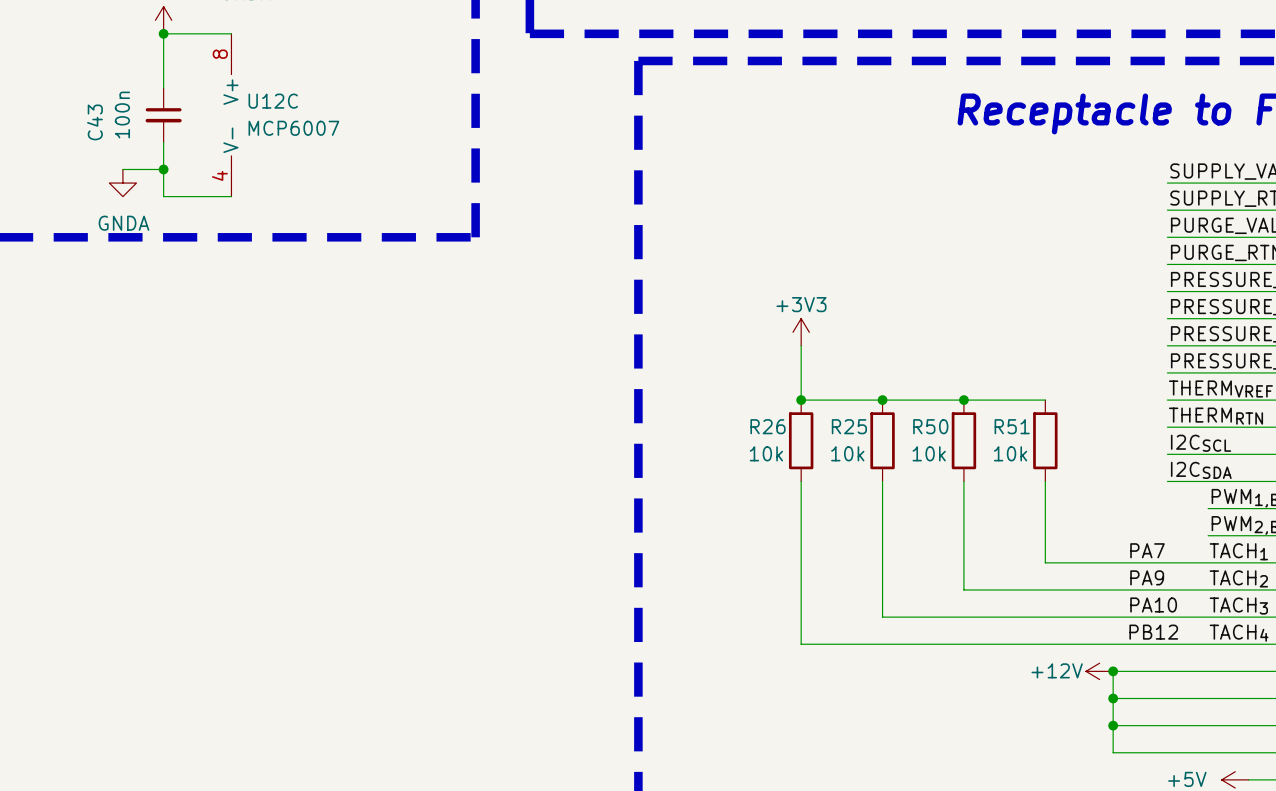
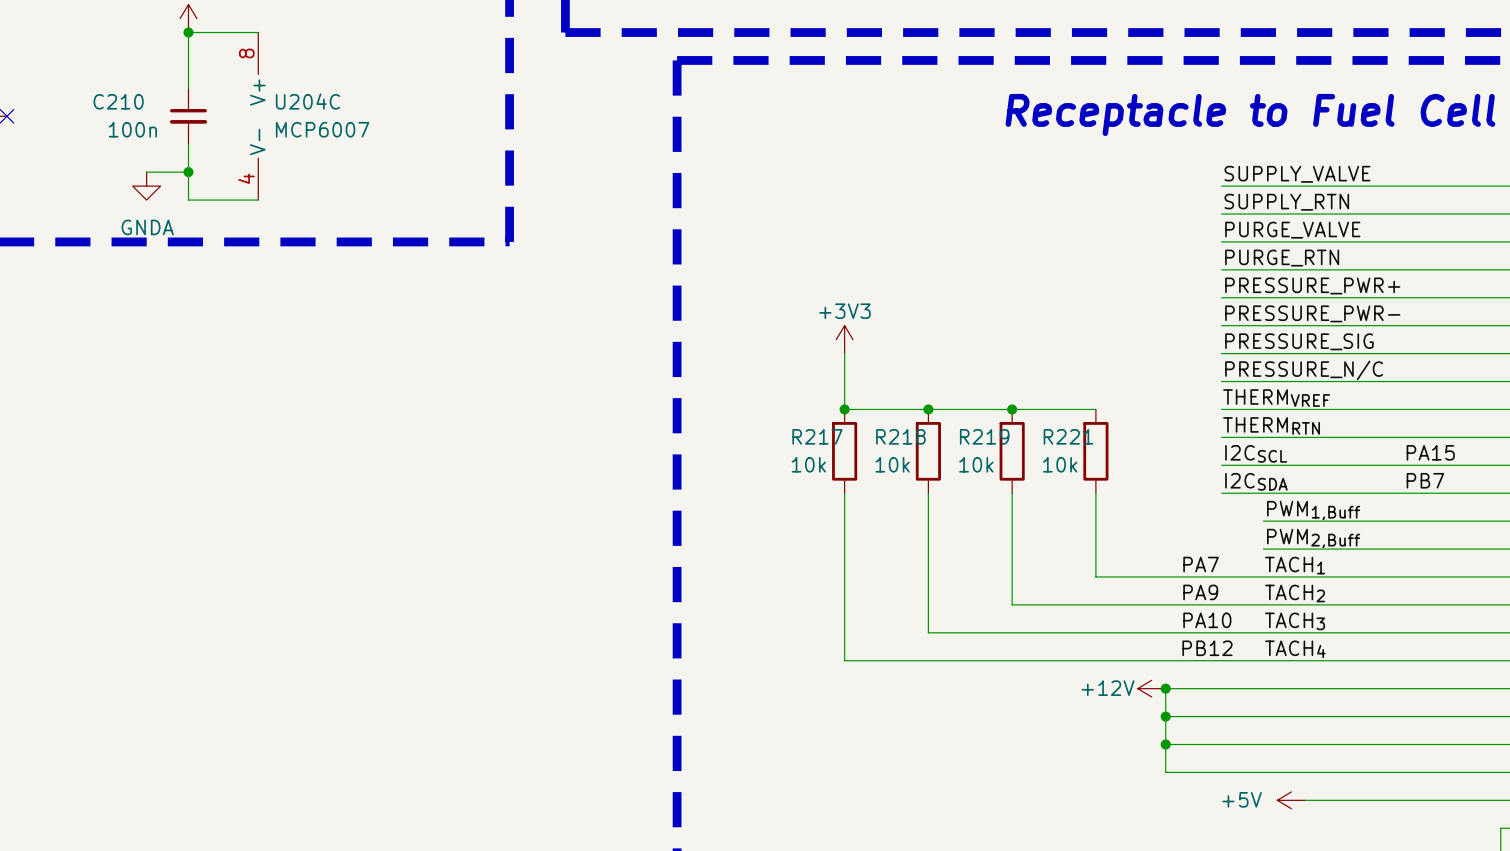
U12C name: U12C (273, 101) -> U204C (307, 101)
C43 value rotation: 0° (122, 115) -> 90° clockwise (132, 129)
C43 name: C43 (94, 122) -> C210 (118, 101)
R26 name: R26 (768, 426) -> R217 (817, 436)
R25 name: R25 (849, 426) -> R218 (900, 436)
R50 name: R50 (930, 426) -> R219 (984, 436)
R51 name: R51 (1012, 426) -> R221 (1068, 436)

